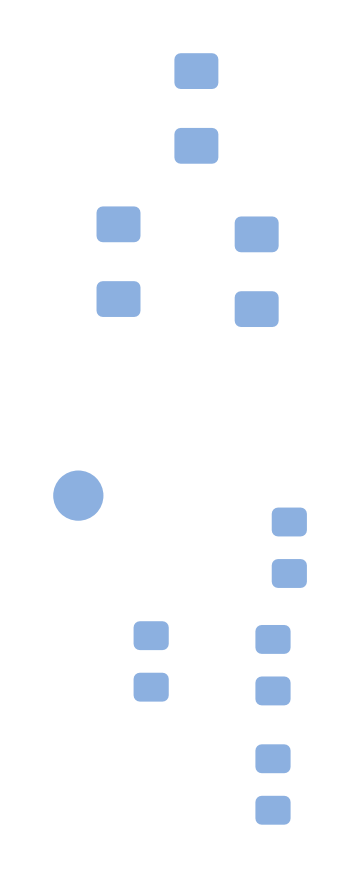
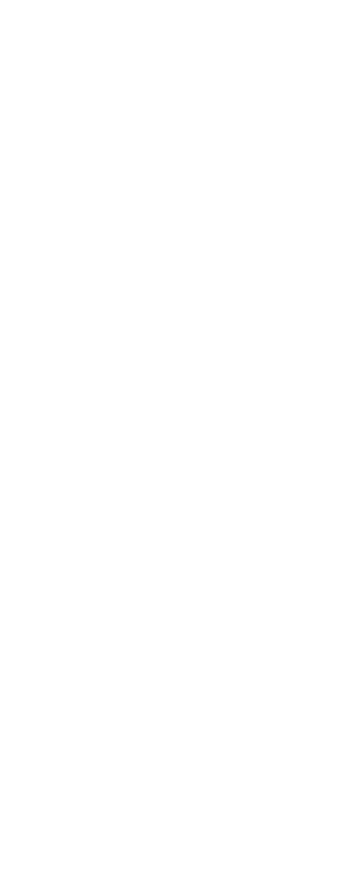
part: (196, 108) -> none
part: (118, 261) -> none
part: (256, 271) -> none
part: (78, 495) -> none
part: (289, 547) -> none
part: (151, 661) -> none
part: (272, 665) -> none
part: (272, 784) -> none

